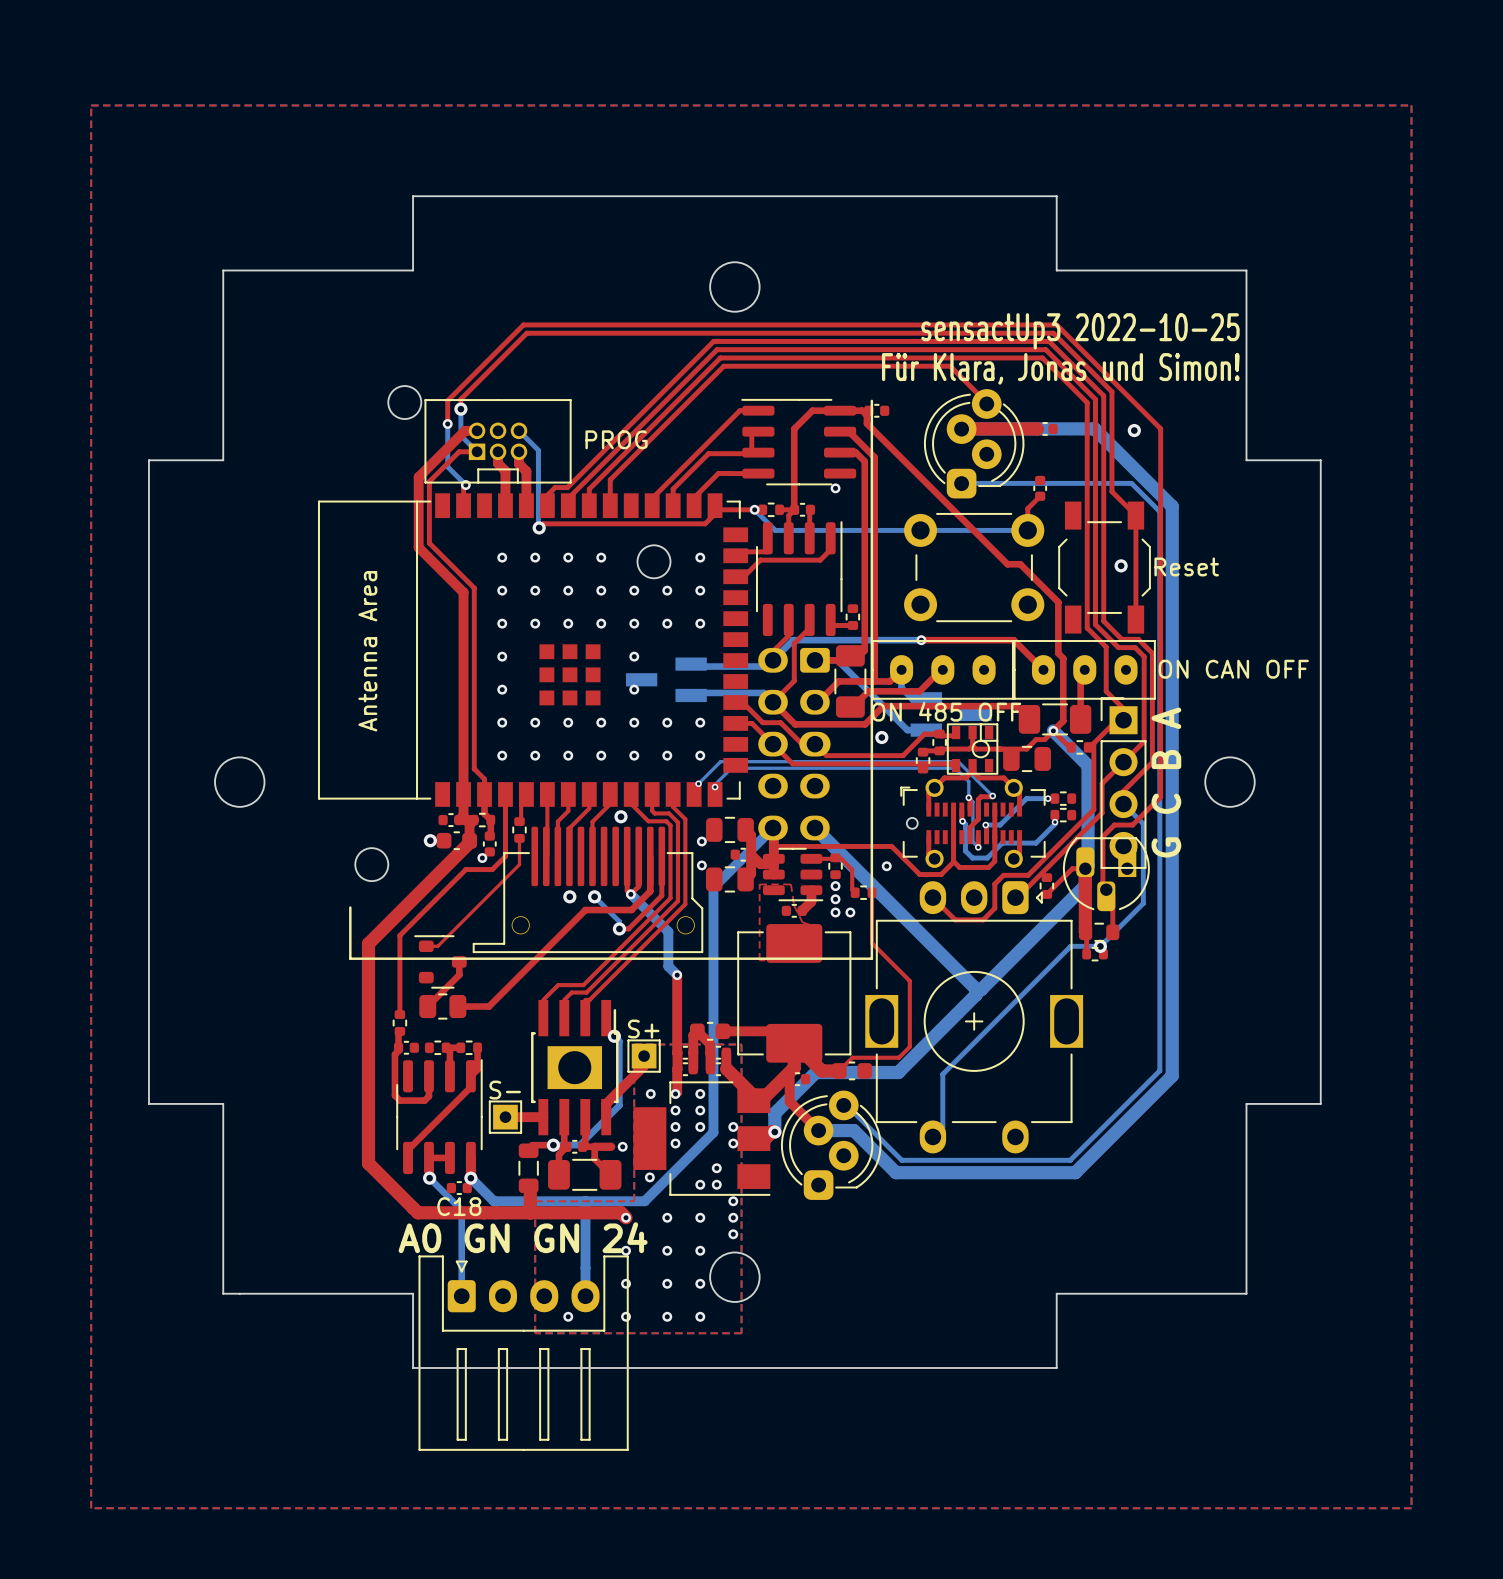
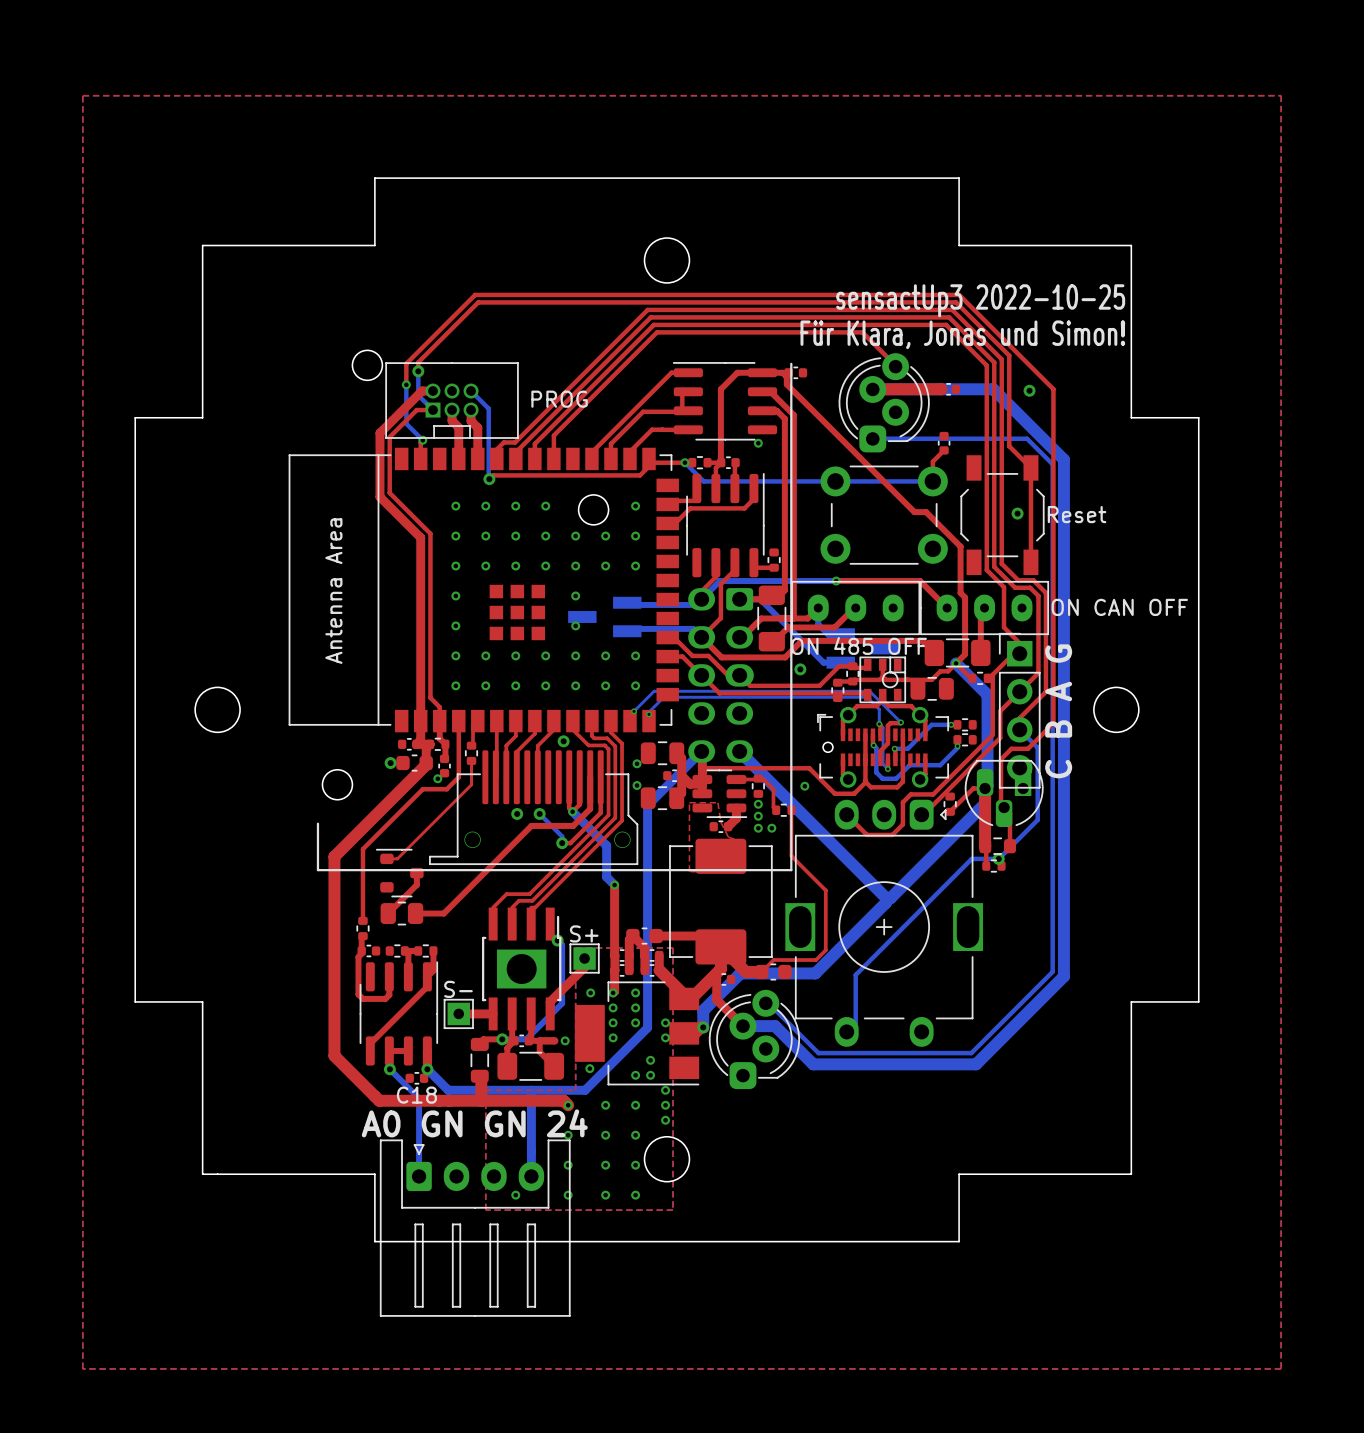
part value: G C B A (1166, 782) -> C B A G (1058, 711)

